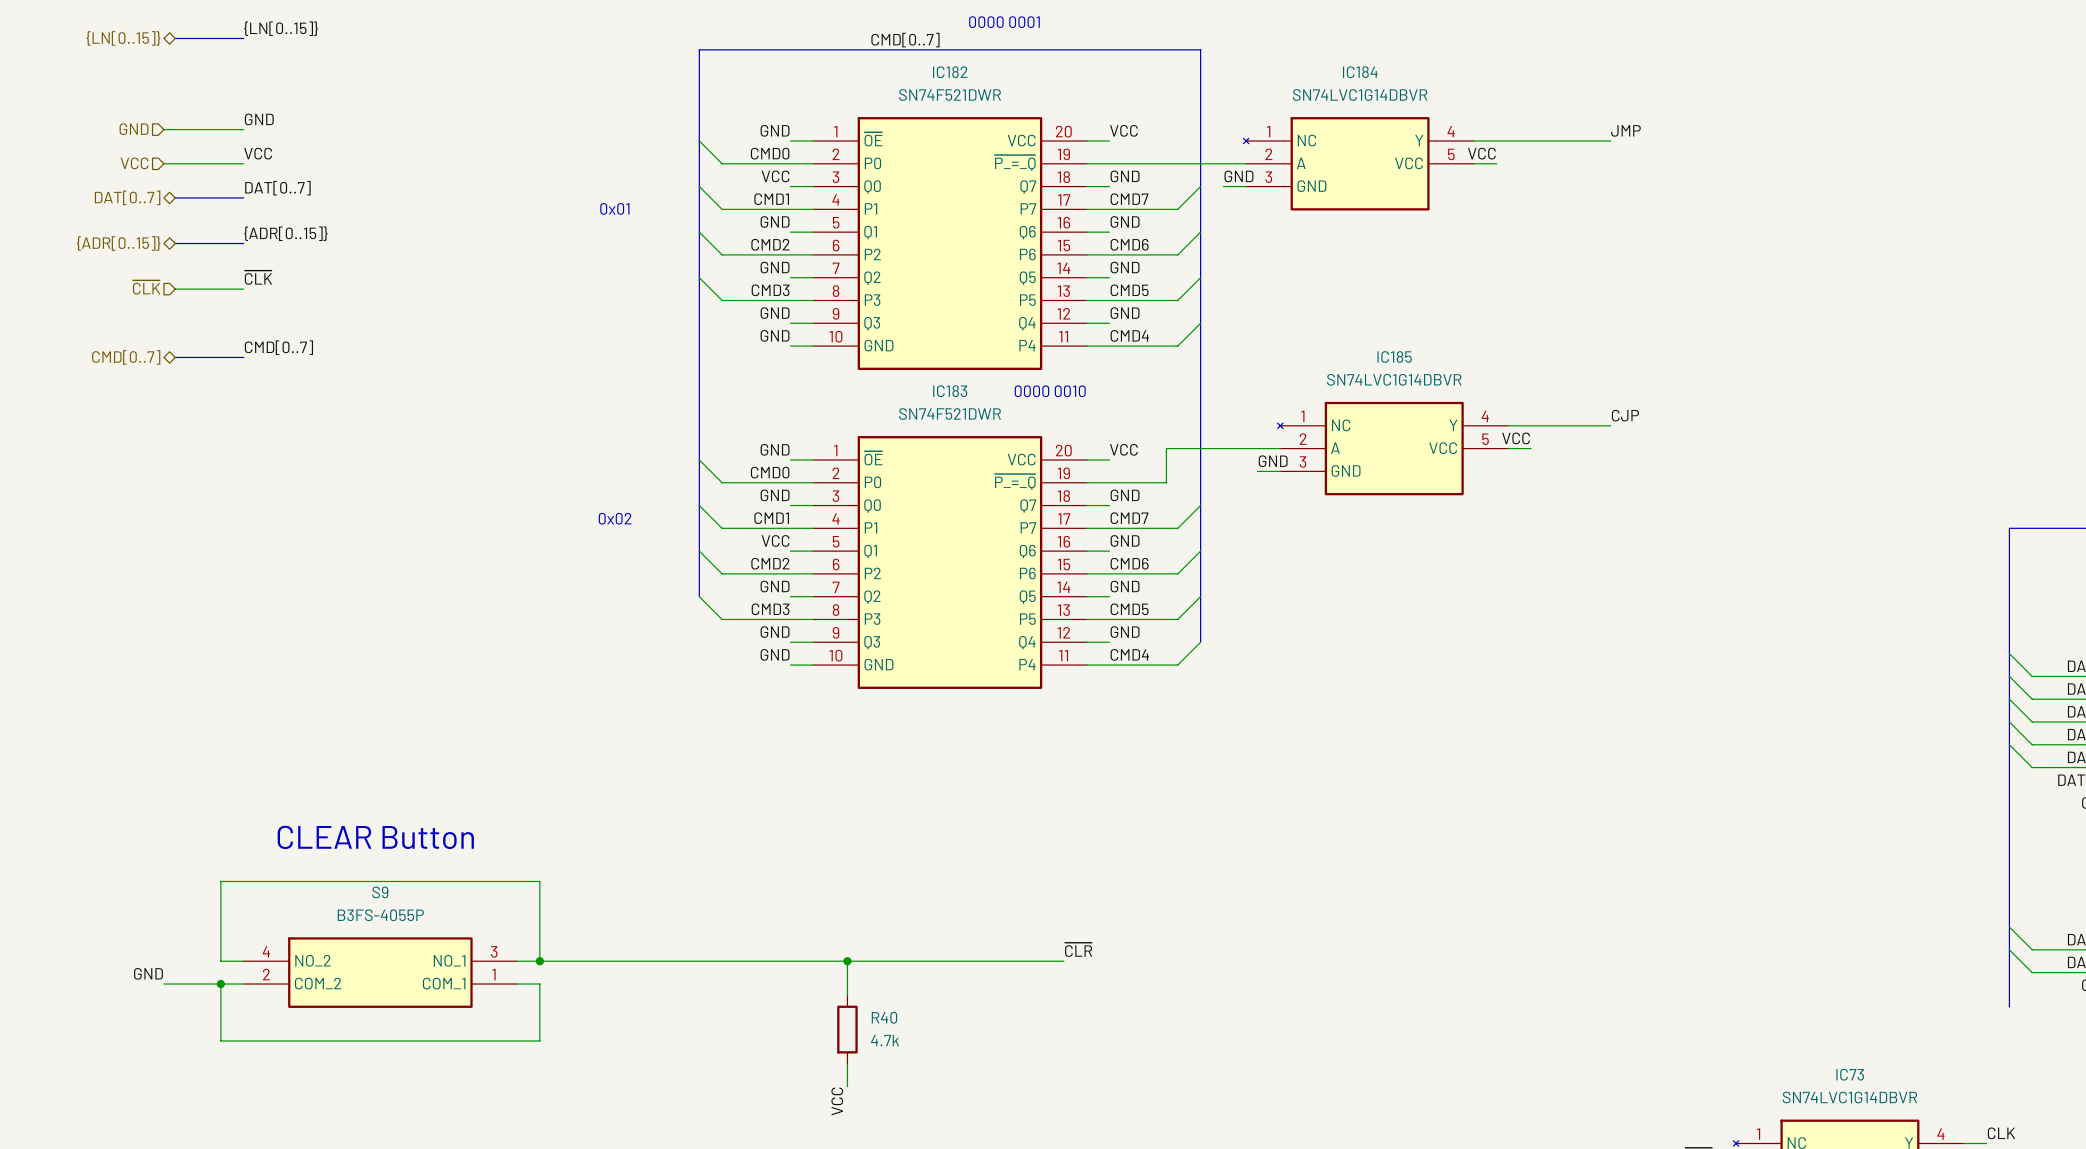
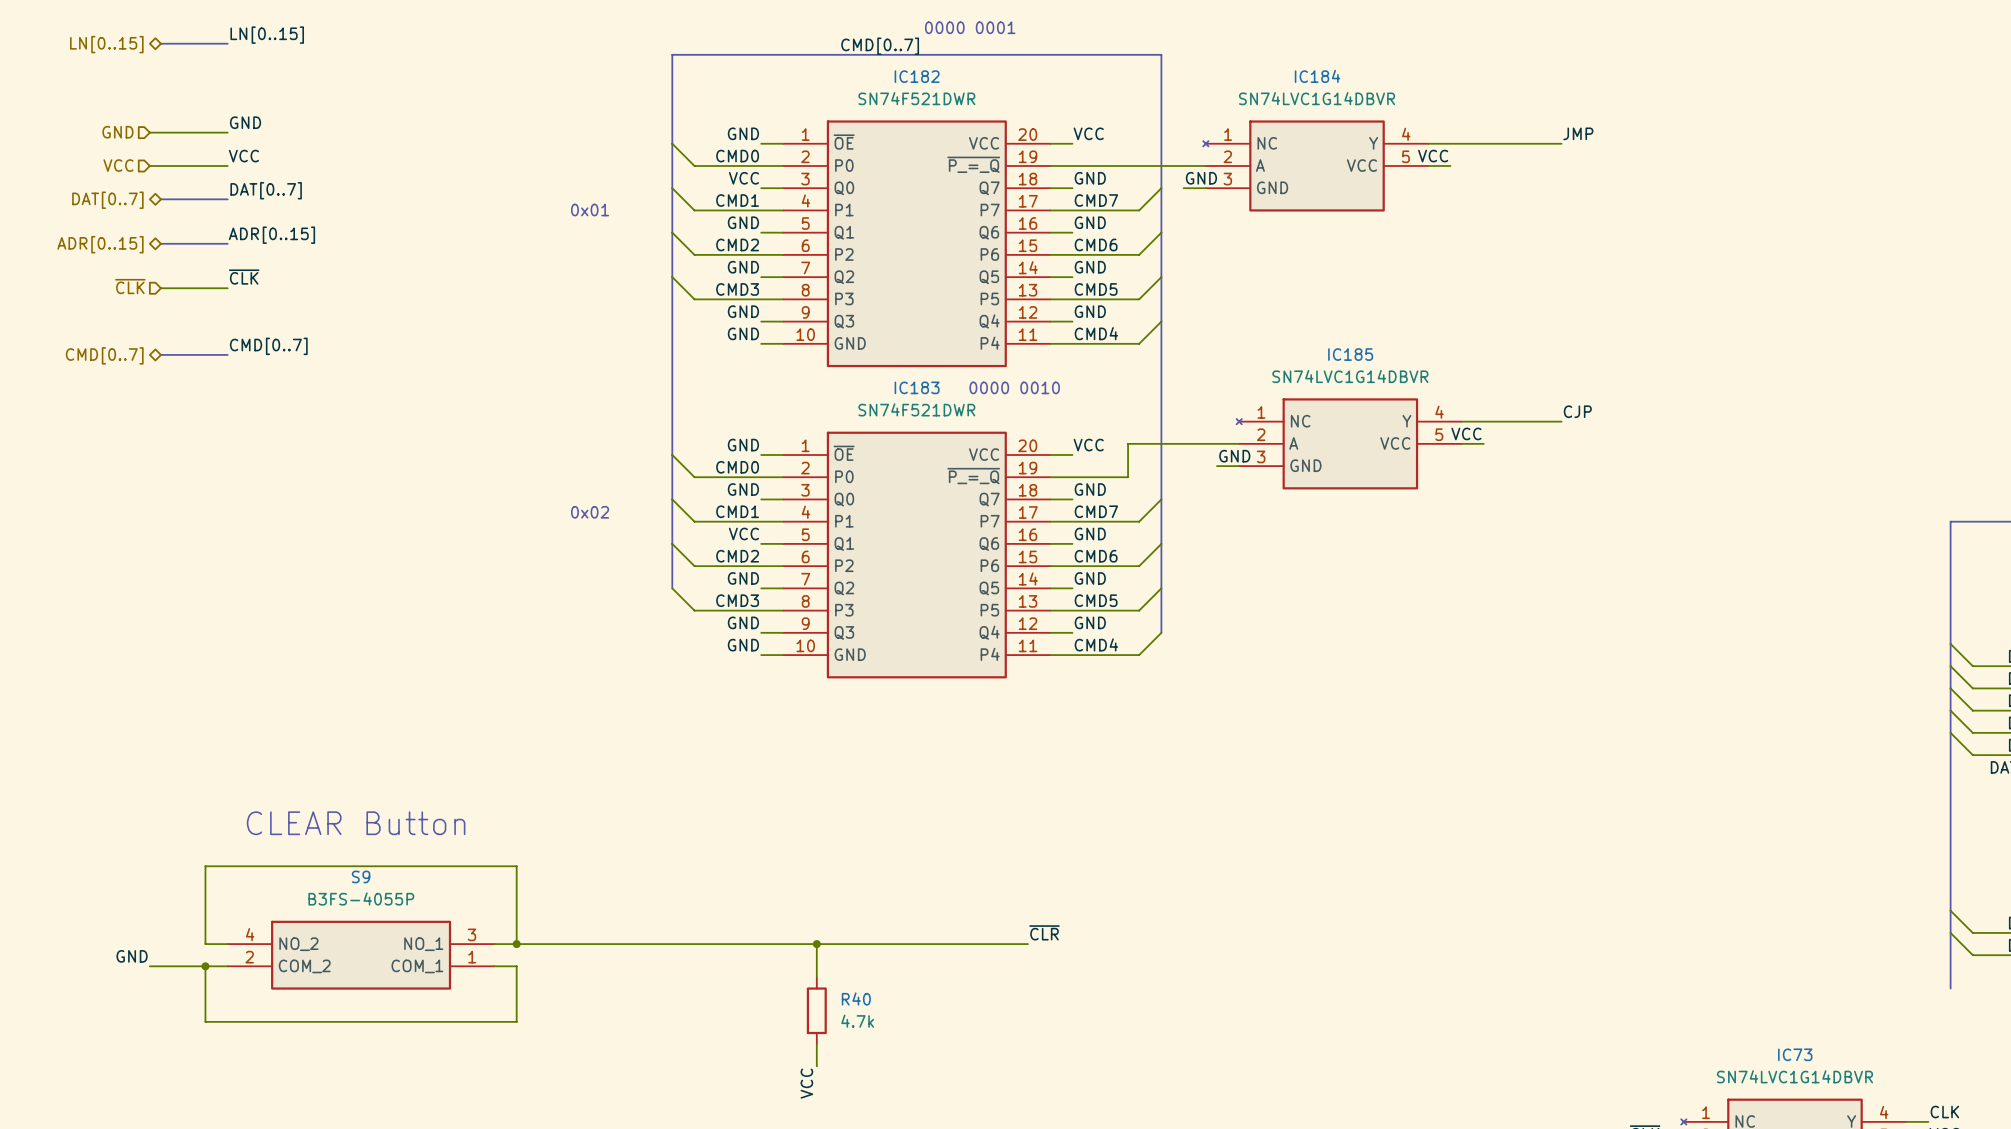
label: {LN[0..15]} (281, 28) -> LN[0..15] (267, 35)
hierarchical label: {LN[0..15]} (123, 38) -> LN[0..15] (106, 44)
label: {ADR[0..15]} (285, 233) -> ADR[0..15] (271, 235)
hierarchical label: {ADR[0..15]} (118, 243) -> ADR[0..15] (100, 244)

